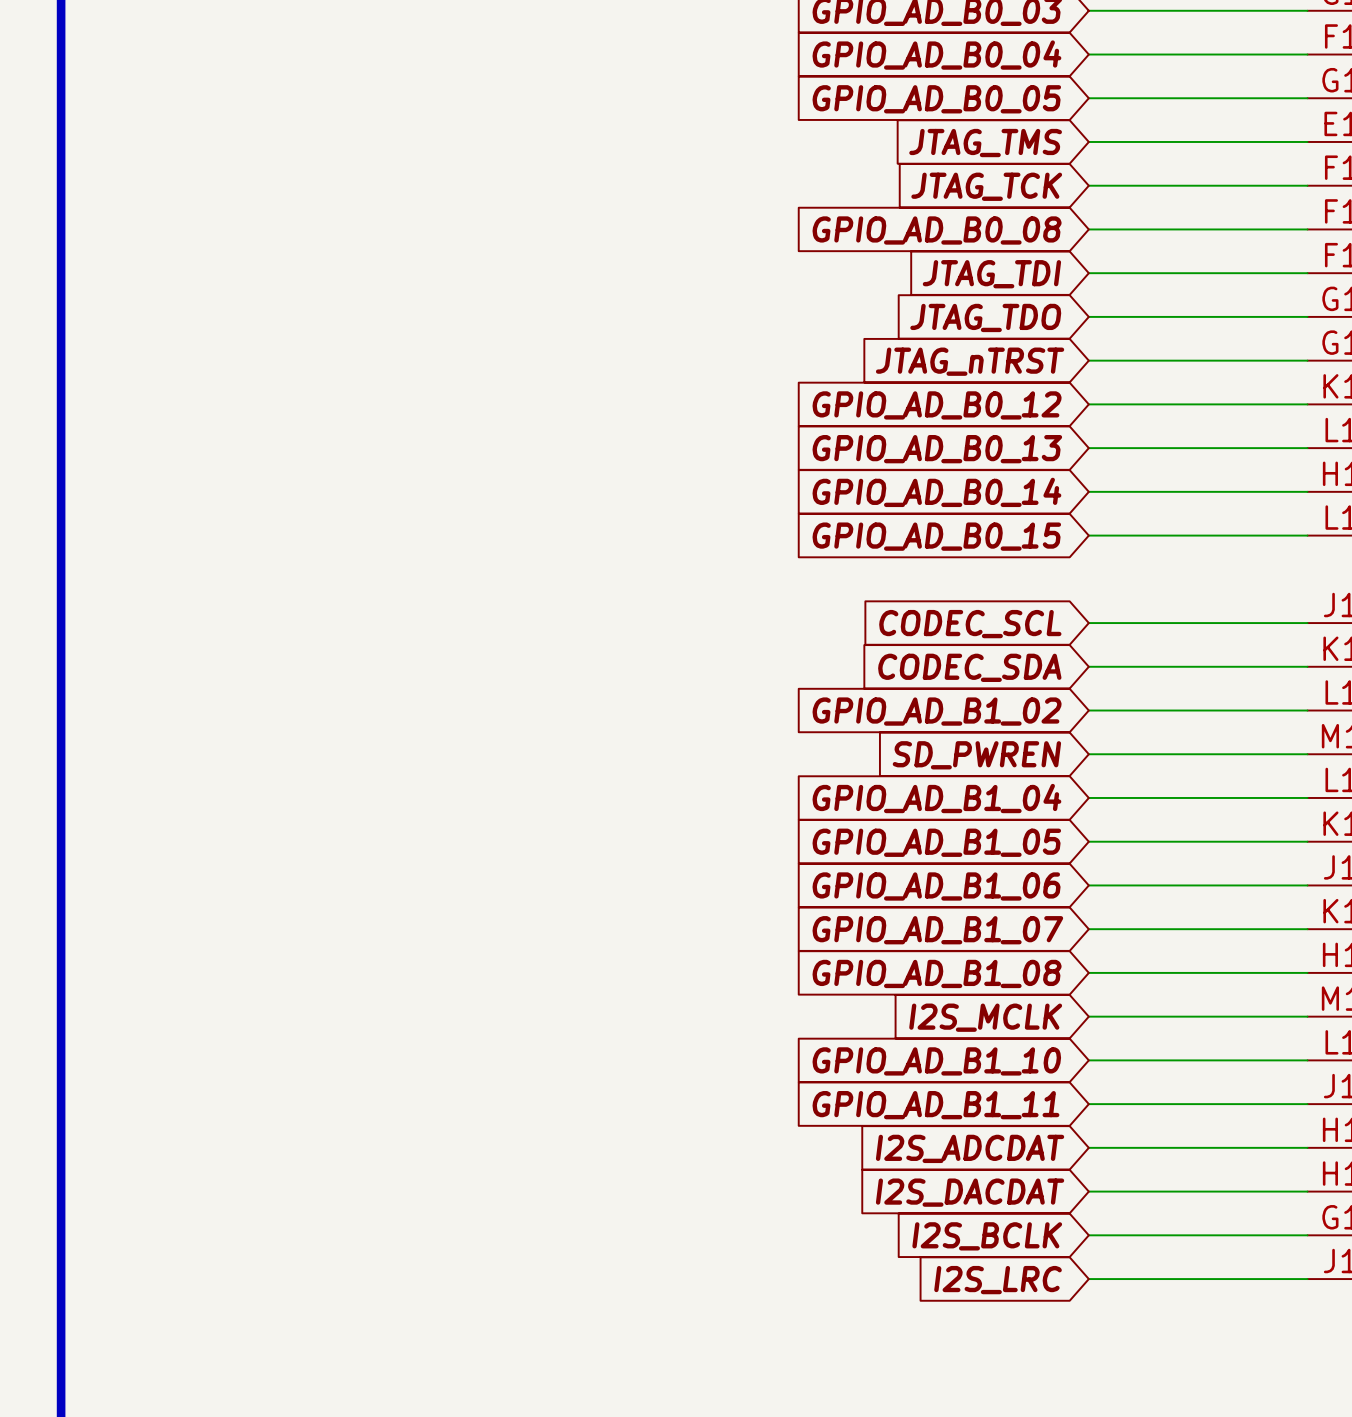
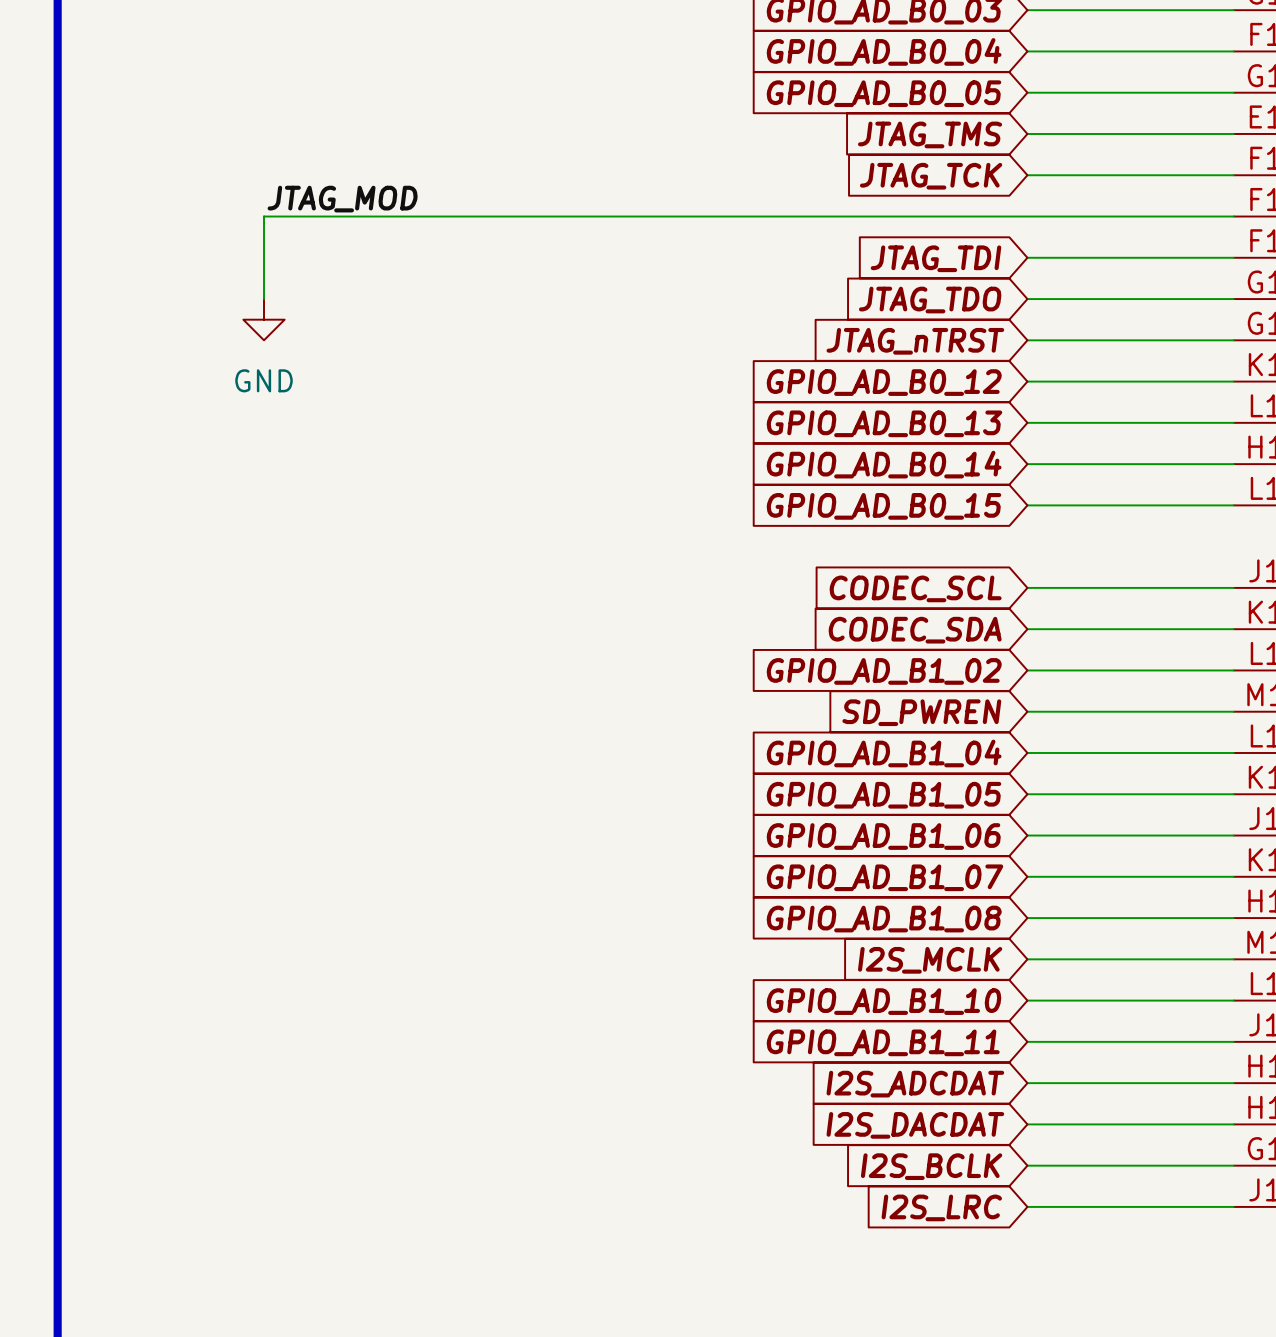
label: none -> JTAG_MOD (342, 199)
wire: none -> (1027, 216) (264, 216) (264, 299)
global label: GPIO_AD_B0_08 (937, 230) -> none
power symbol: none -> GND (264, 319)

